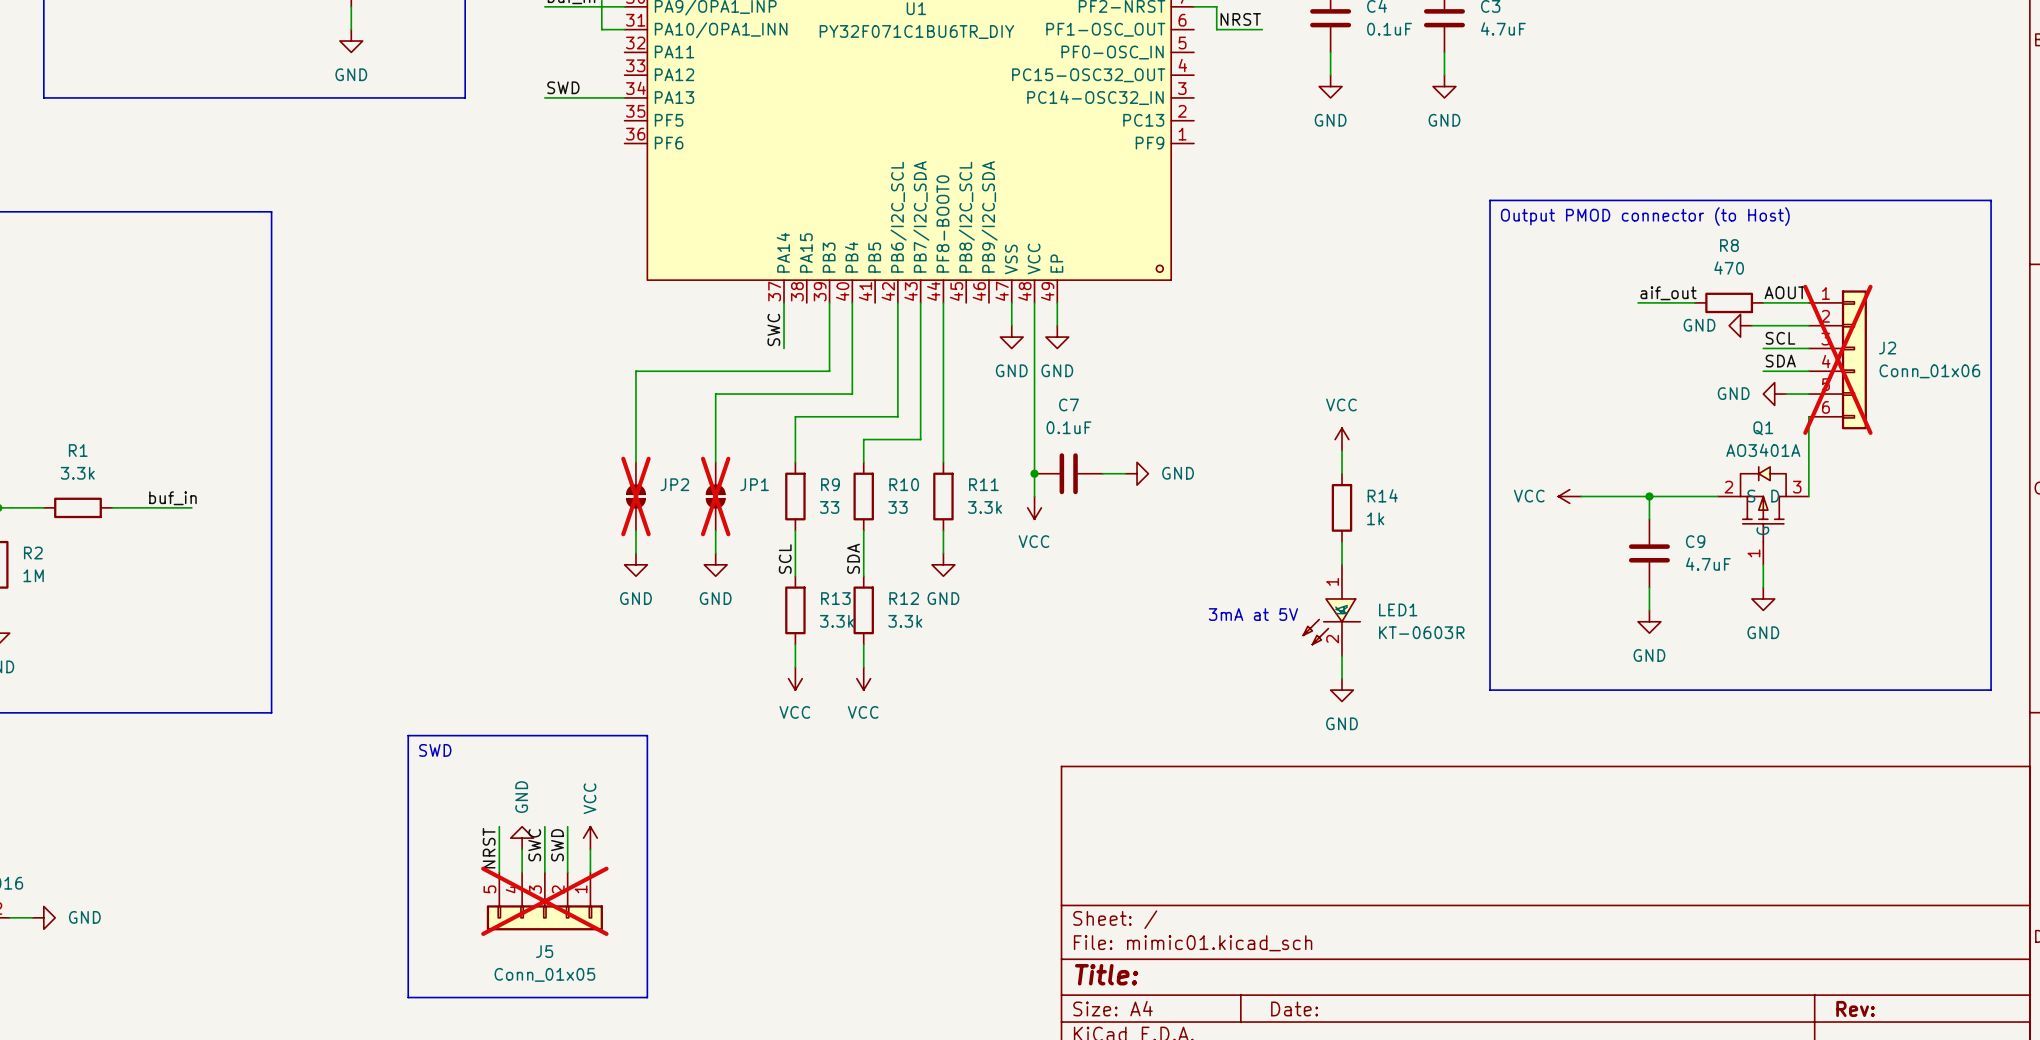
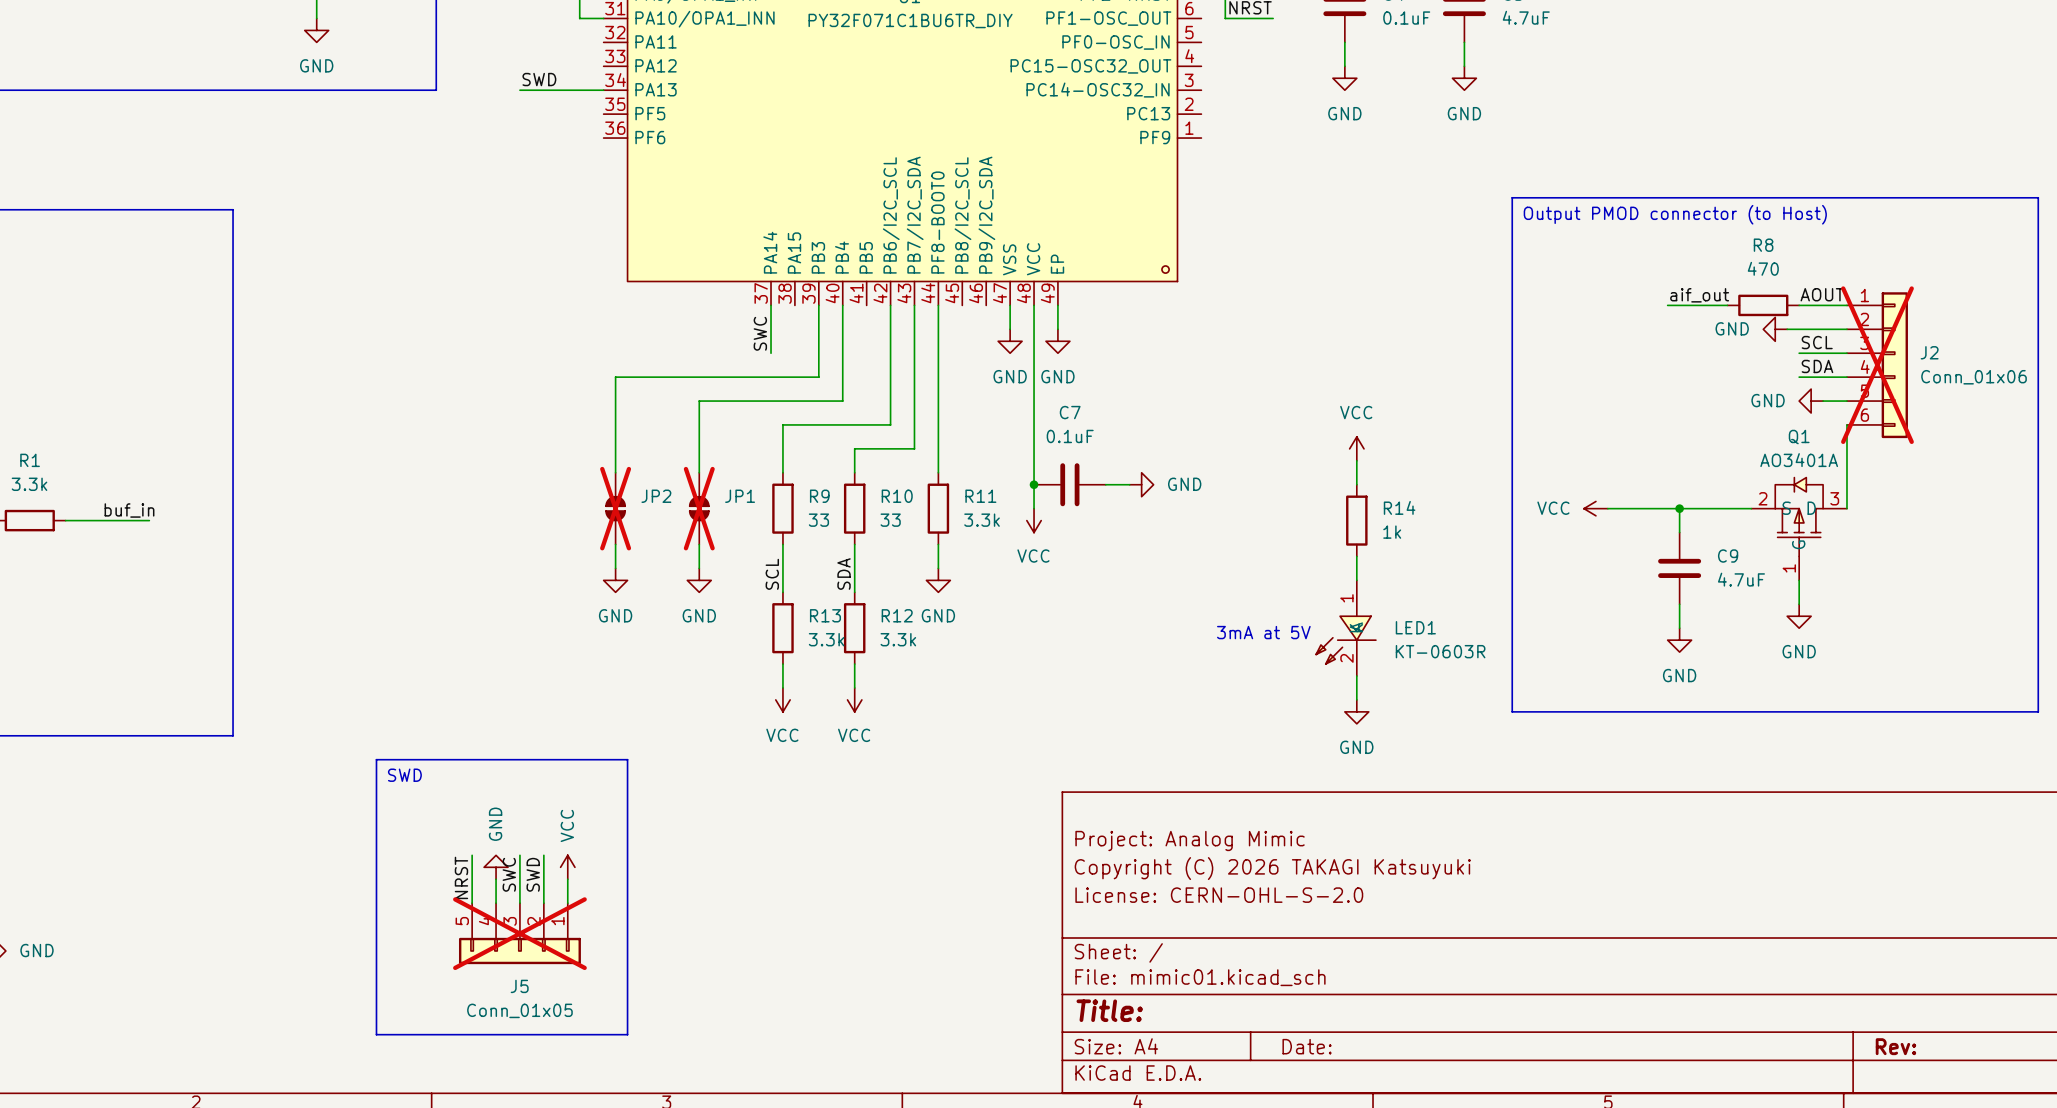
title block: none -> Project: Analog Mimic (1190, 840)
title block: none -> Copyright (C) 2026 TAKAGI Katsuyuki (1272, 868)
title block: none -> License: CERN-OHL-S-2.0 (1219, 895)

